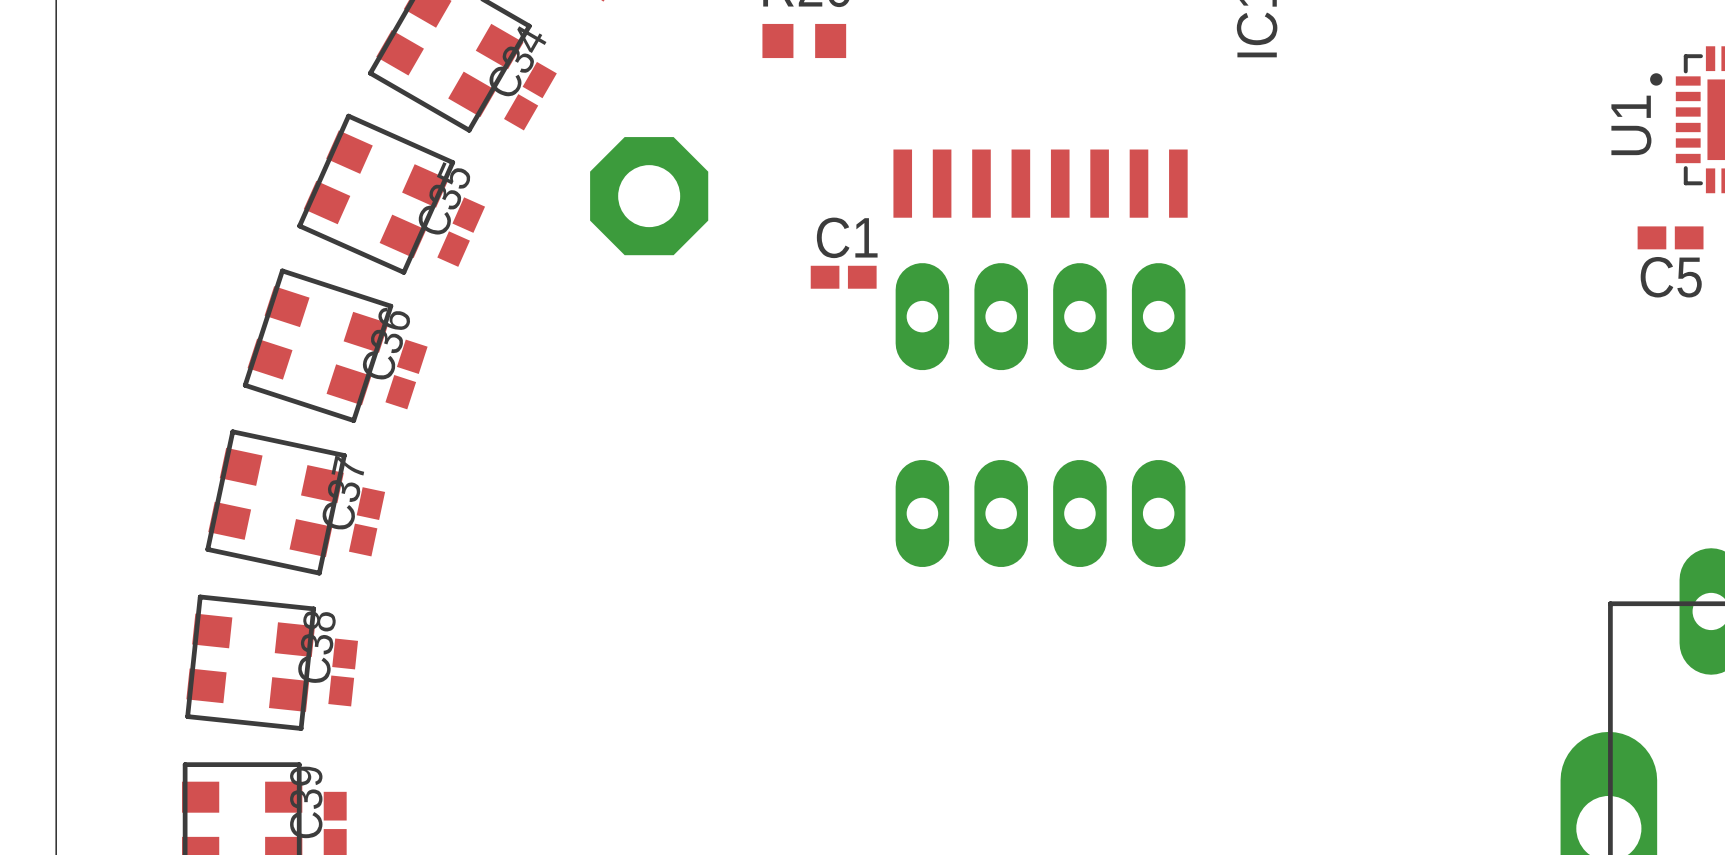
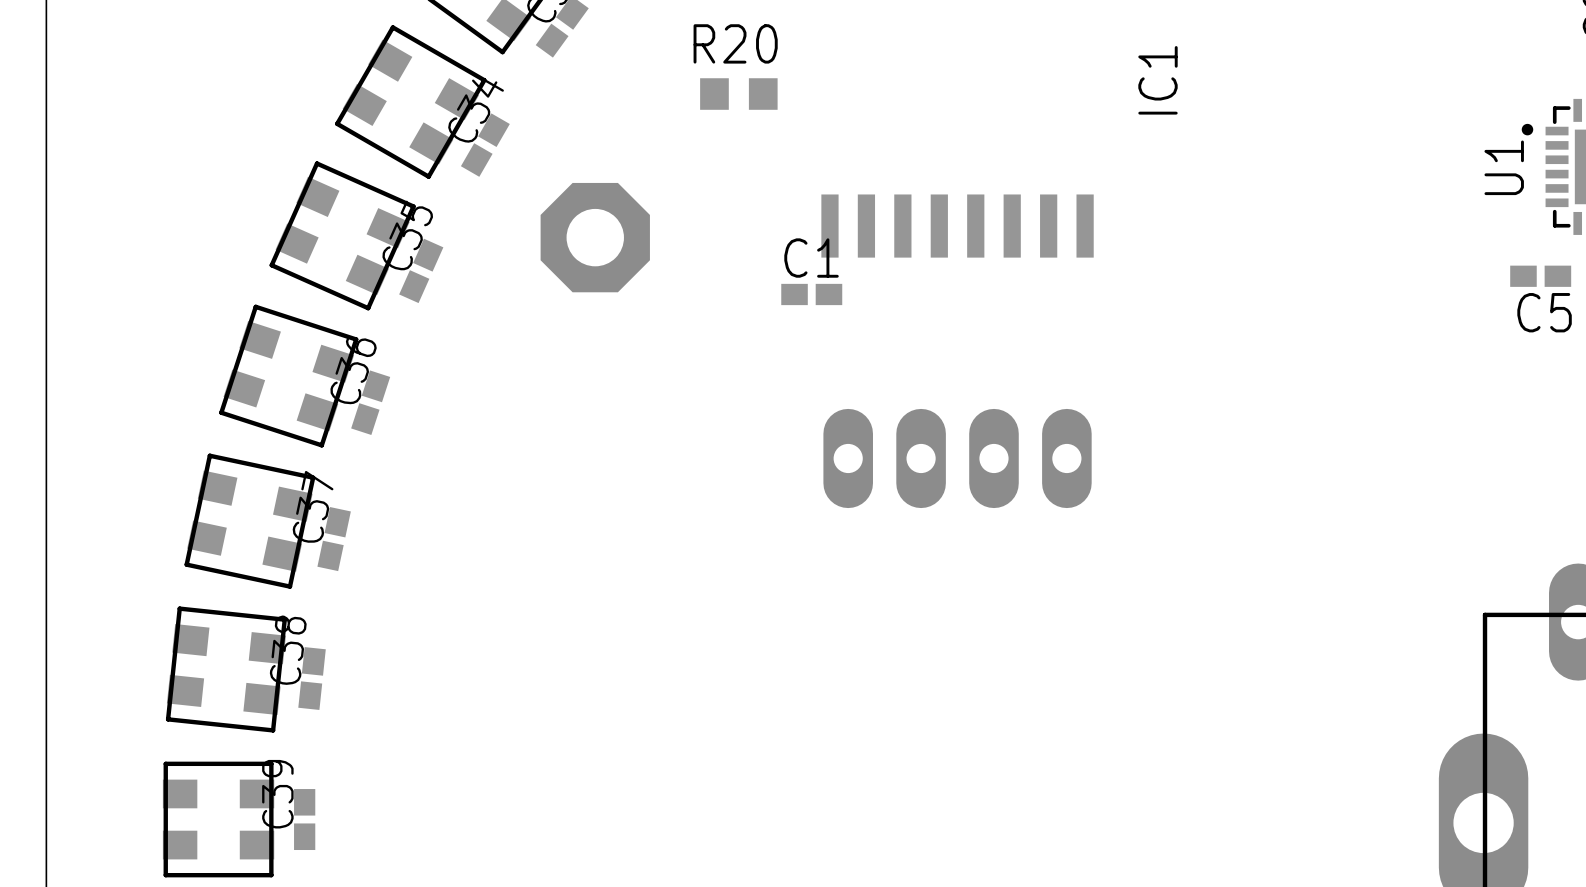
C1 position: (843, 277) -> (811, 294)
part: (1040, 316) -> none
part: none -> (957, 458)
part: (1040, 513) -> none

